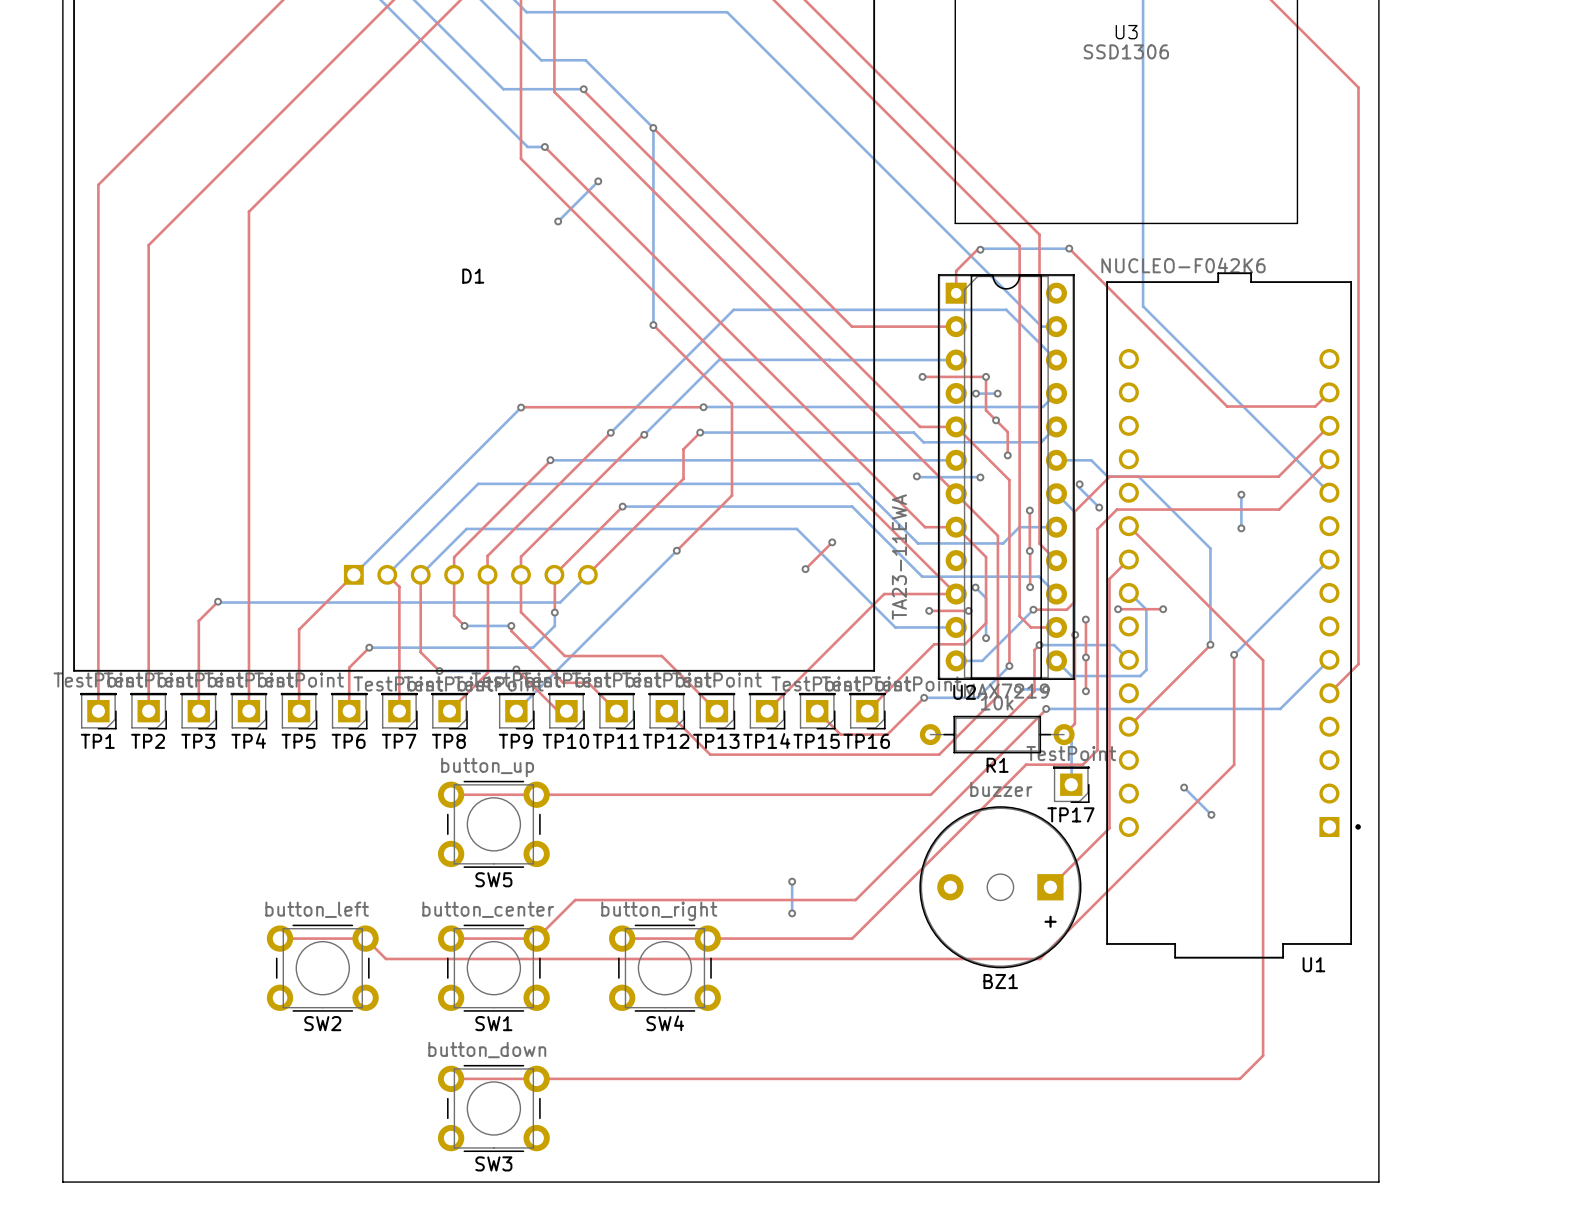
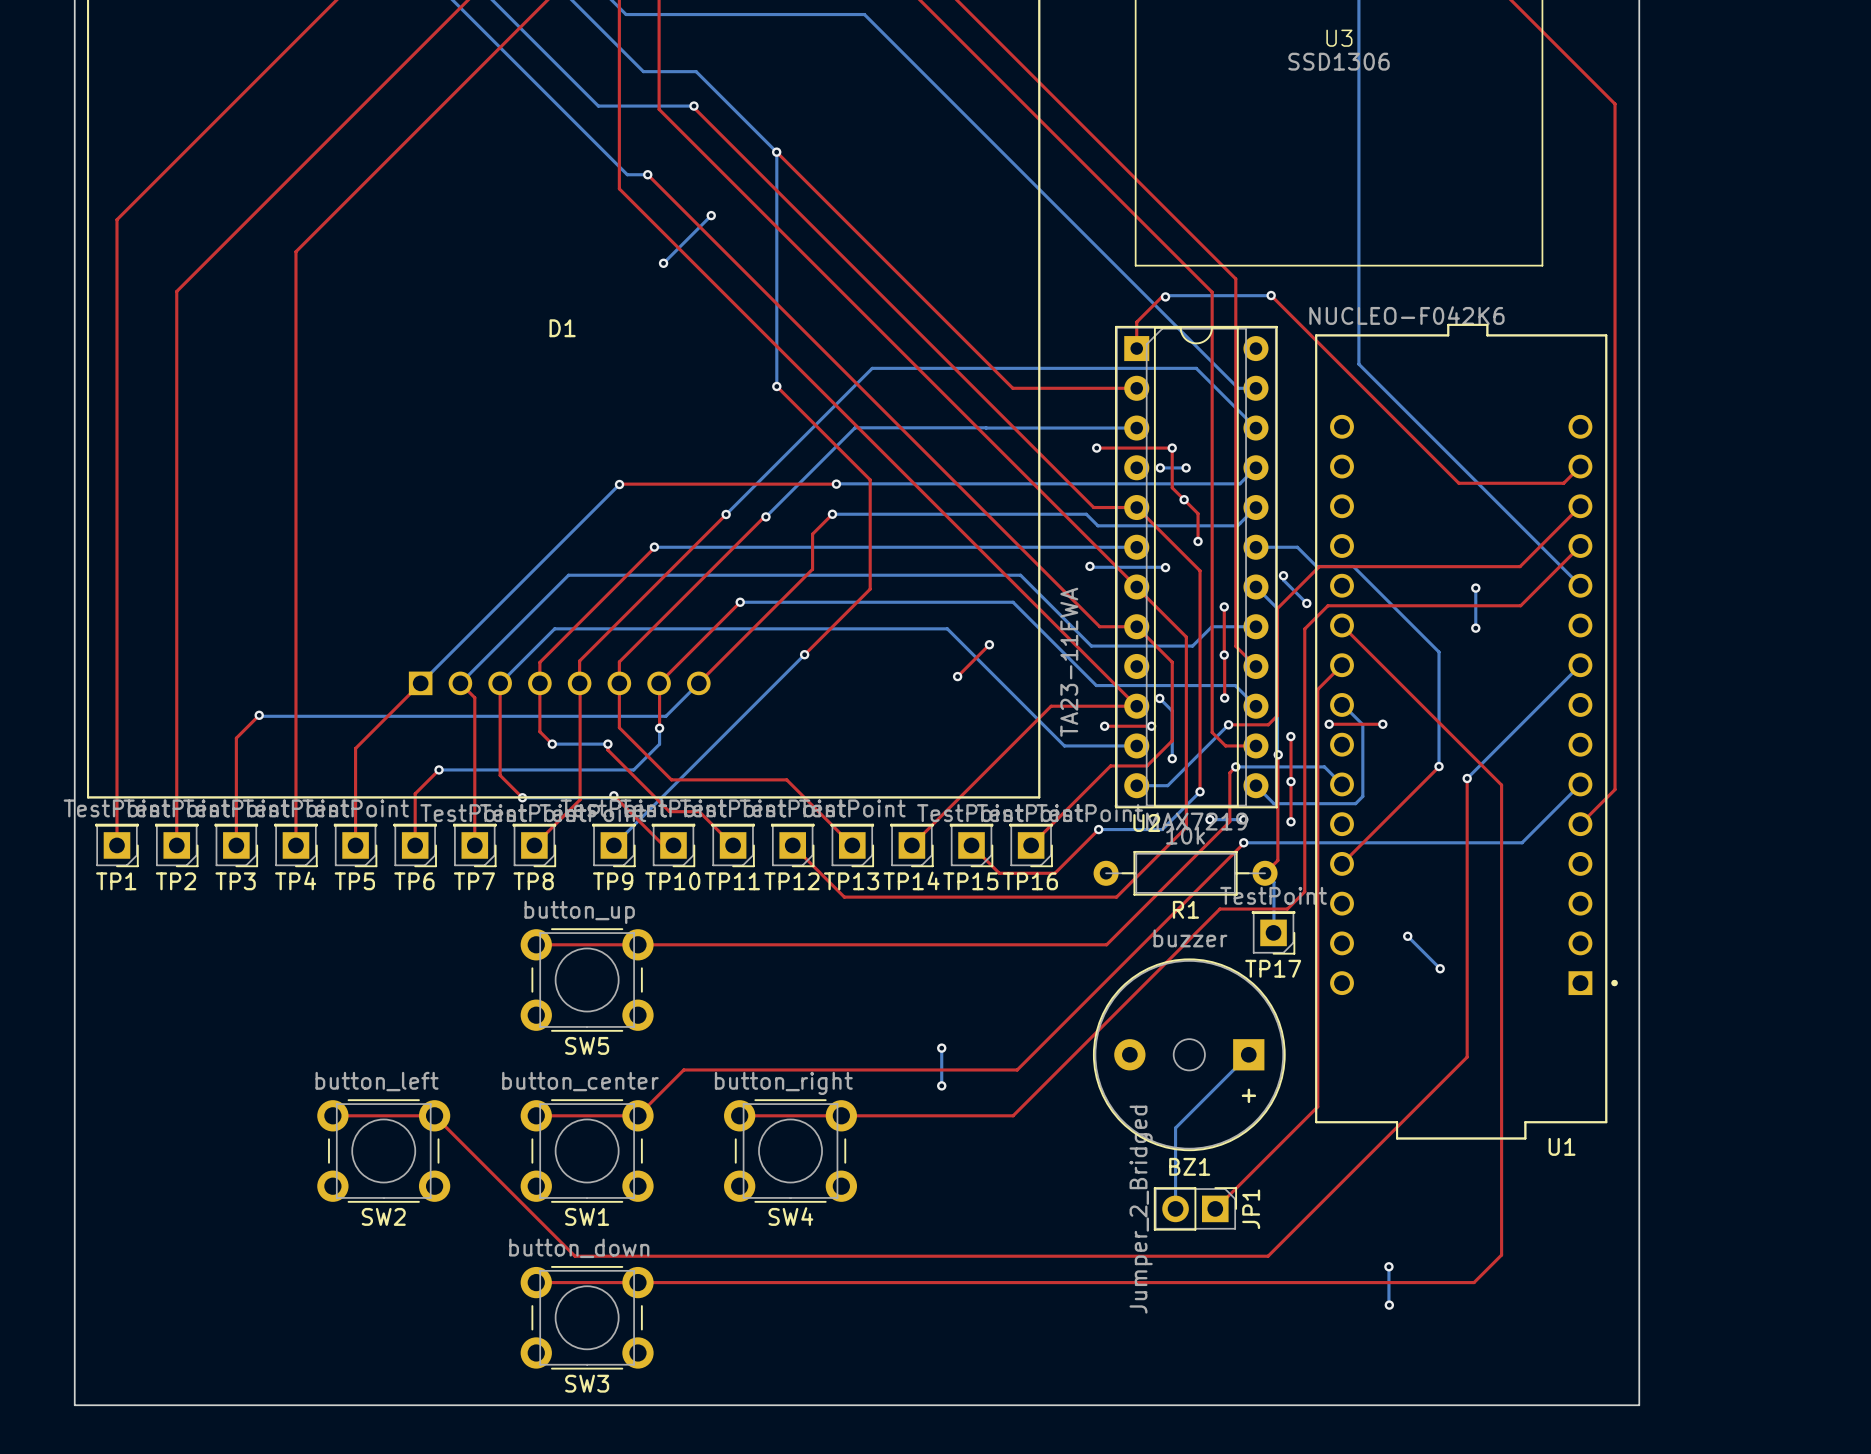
top track: (1109, 578) (1109, 828) (1050, 887) -> (1319, 688) (1317, 1106) (1215, 1208)
top track: (1234, 764) (1040, 958) (385, 958) -> (1467, 909) (1467, 1057) (1268, 1256) (575, 1256) (458, 1140)
bottom track: none -> (1248, 1054) (1175, 1128) (1175, 1208)
JP1: none -> Jumper_2_Bridged (1195, 1208)
bottom track: none -> (1388, 1266) (1389, 1305)
via: none -> (1388, 1266)
via: none -> (1389, 1305)

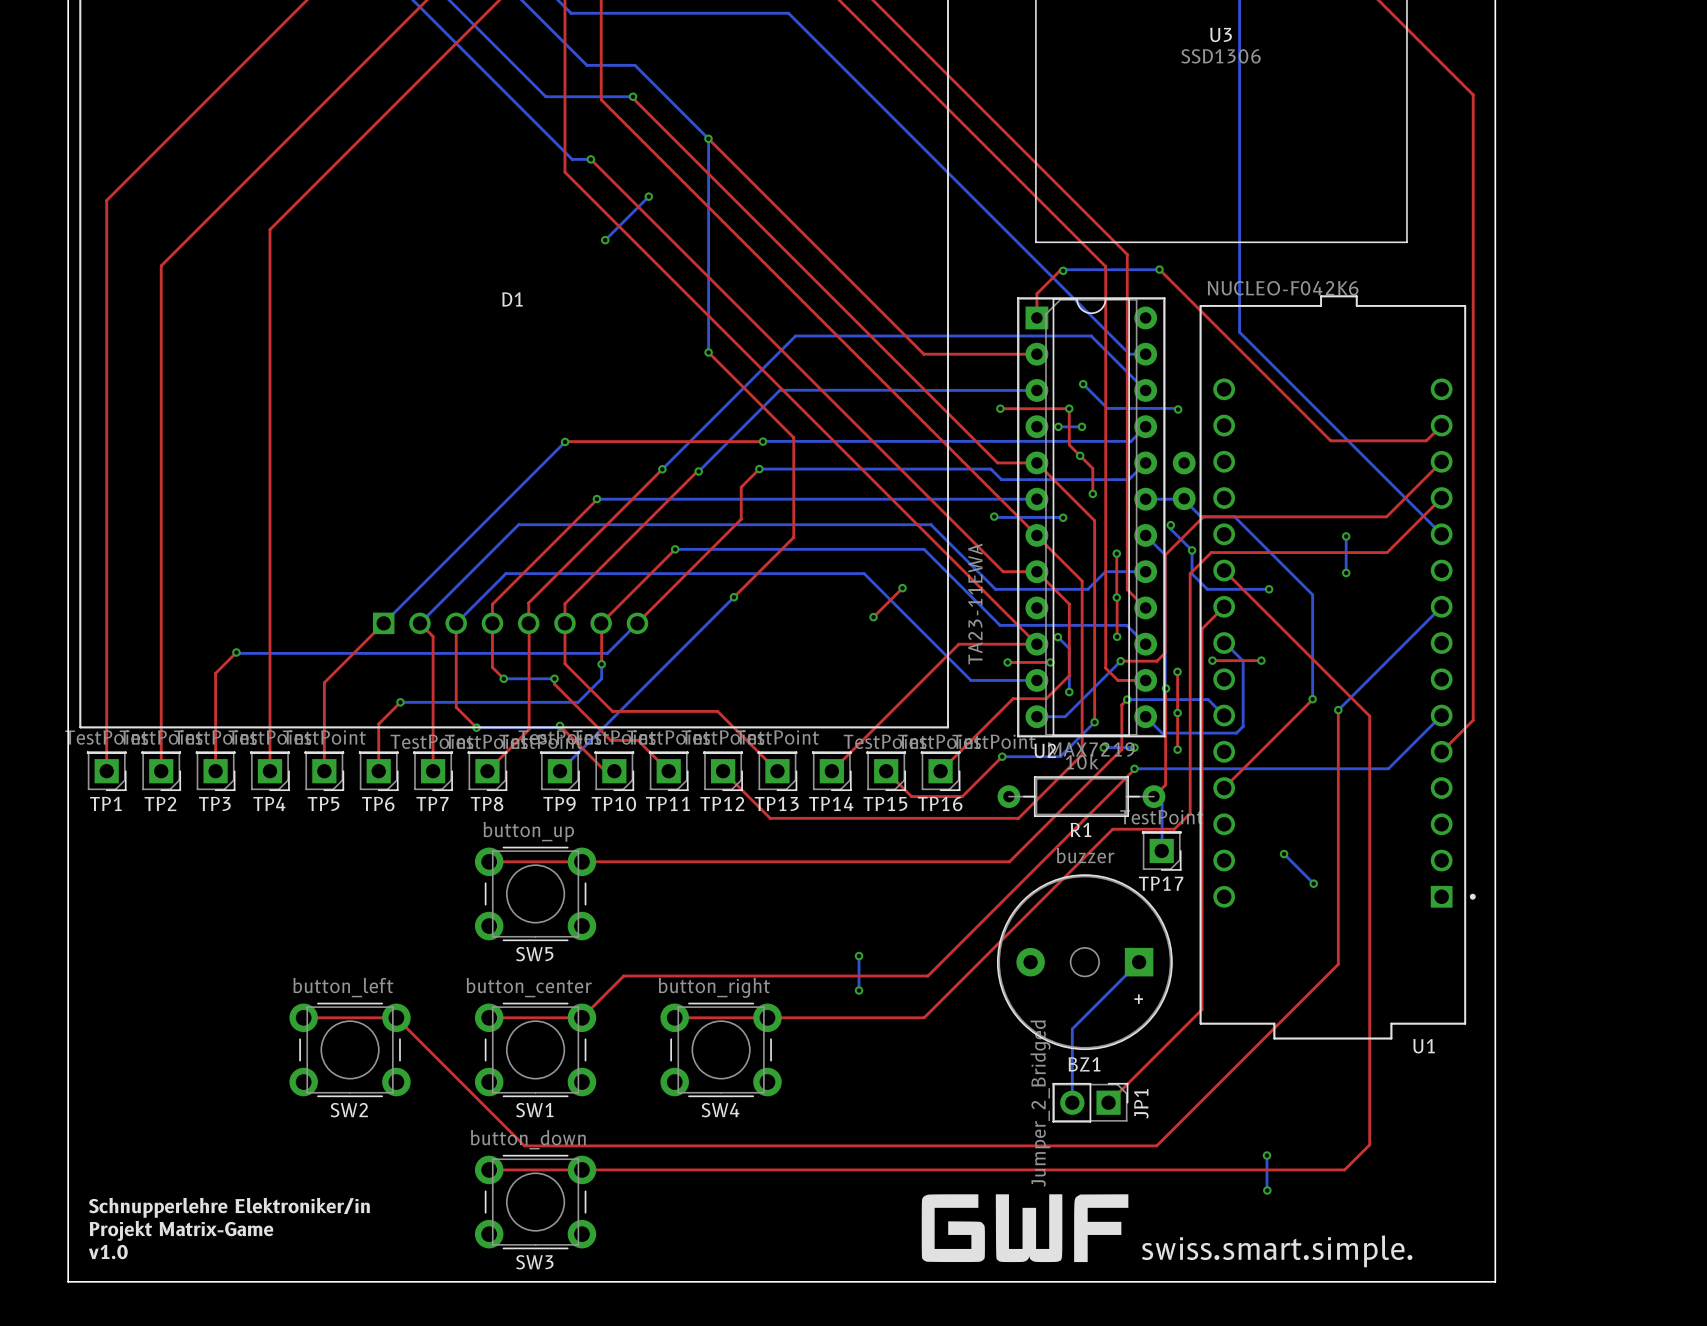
bottom track: none -> (1083, 384) (1107, 408) (1178, 409)
via: none -> (1083, 384)
via: none -> (1178, 409)
part: none -> (1184, 480)
bottom track: none -> (1192, 550) (1192, 573) (1207, 589) (1269, 589)
via: none -> (1269, 589)
drawing: none -> [921, 1194, 1129, 1263]
text: none -> Schnupperlehre Elektroniker/in (229, 1207)
text: none -> Projekt Matrix-Game (181, 1230)
text: none -> v1.0 (108, 1252)
text: none -> swiss.smart.simple. (1277, 1251)

